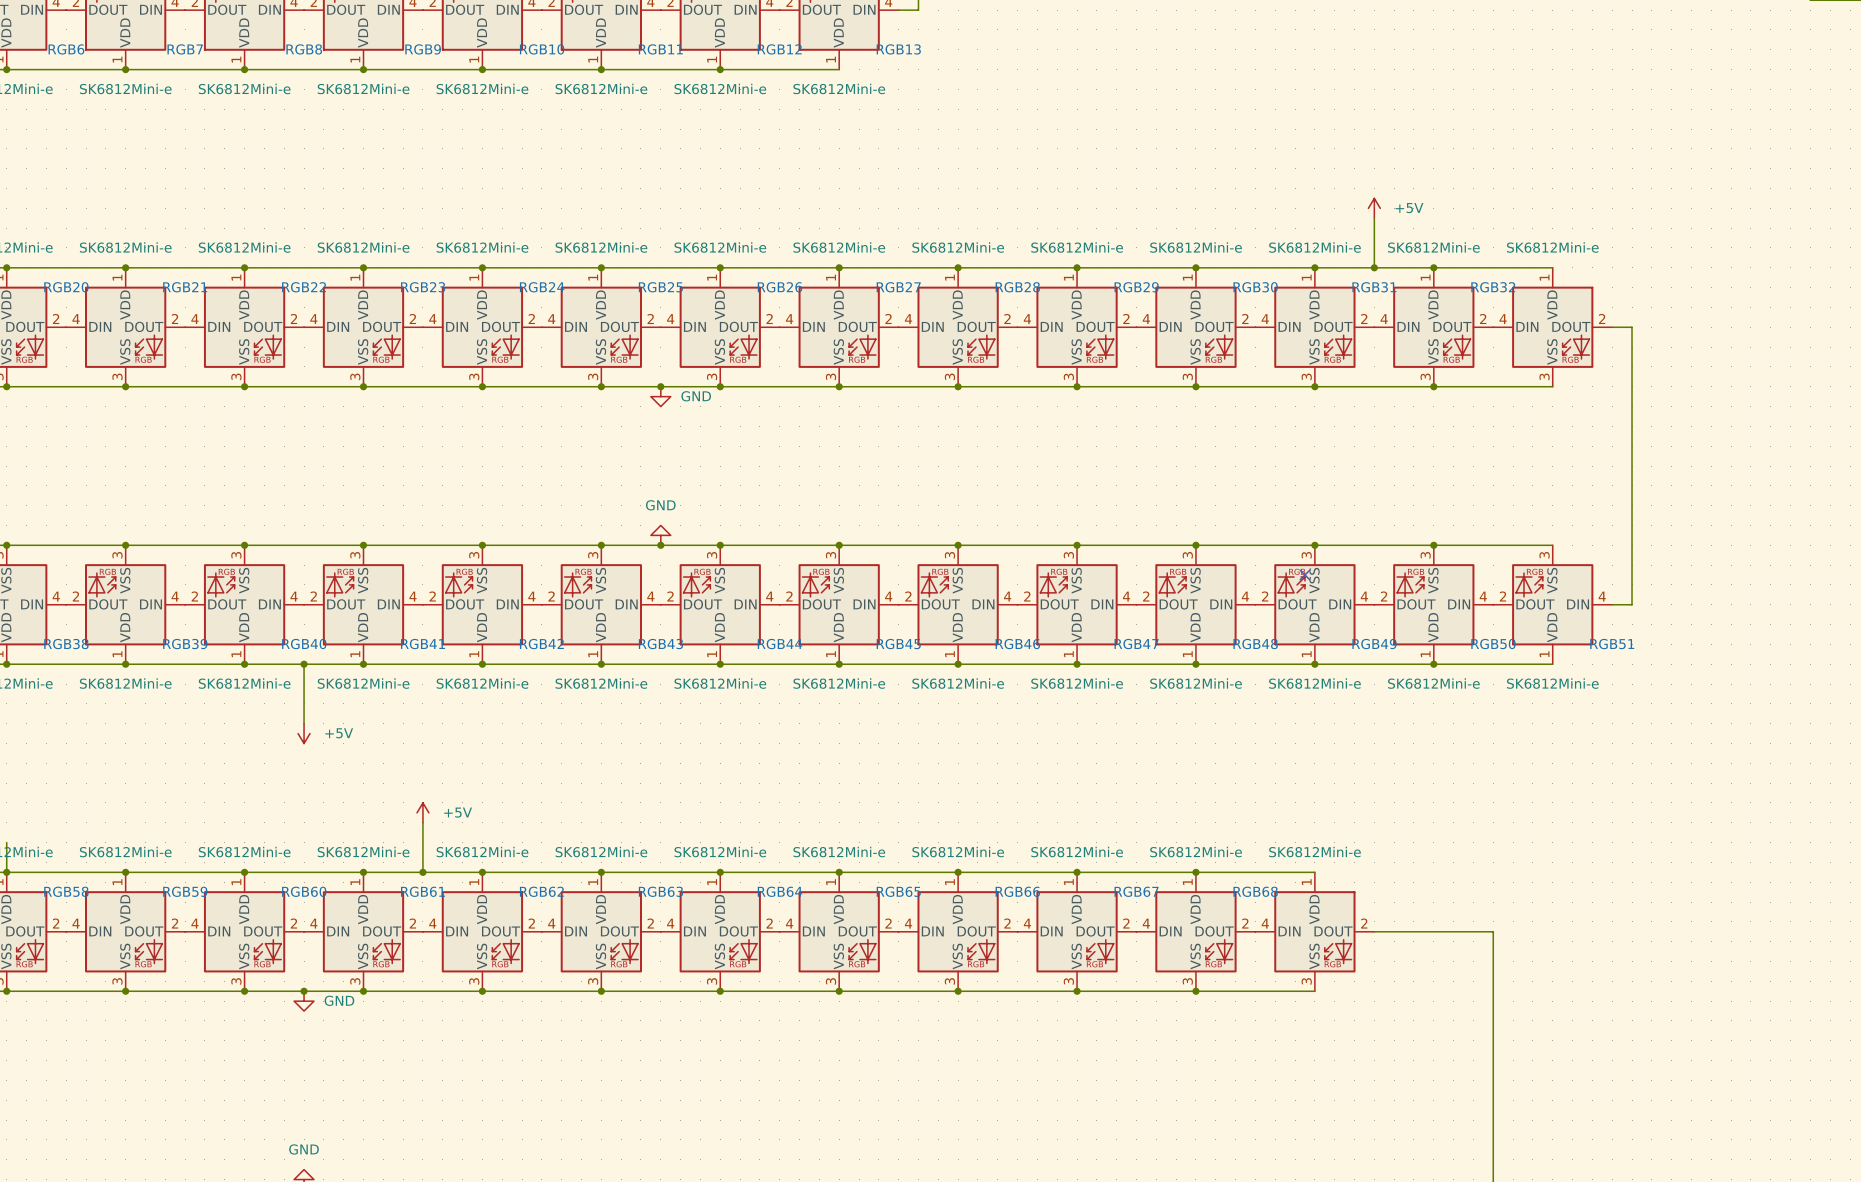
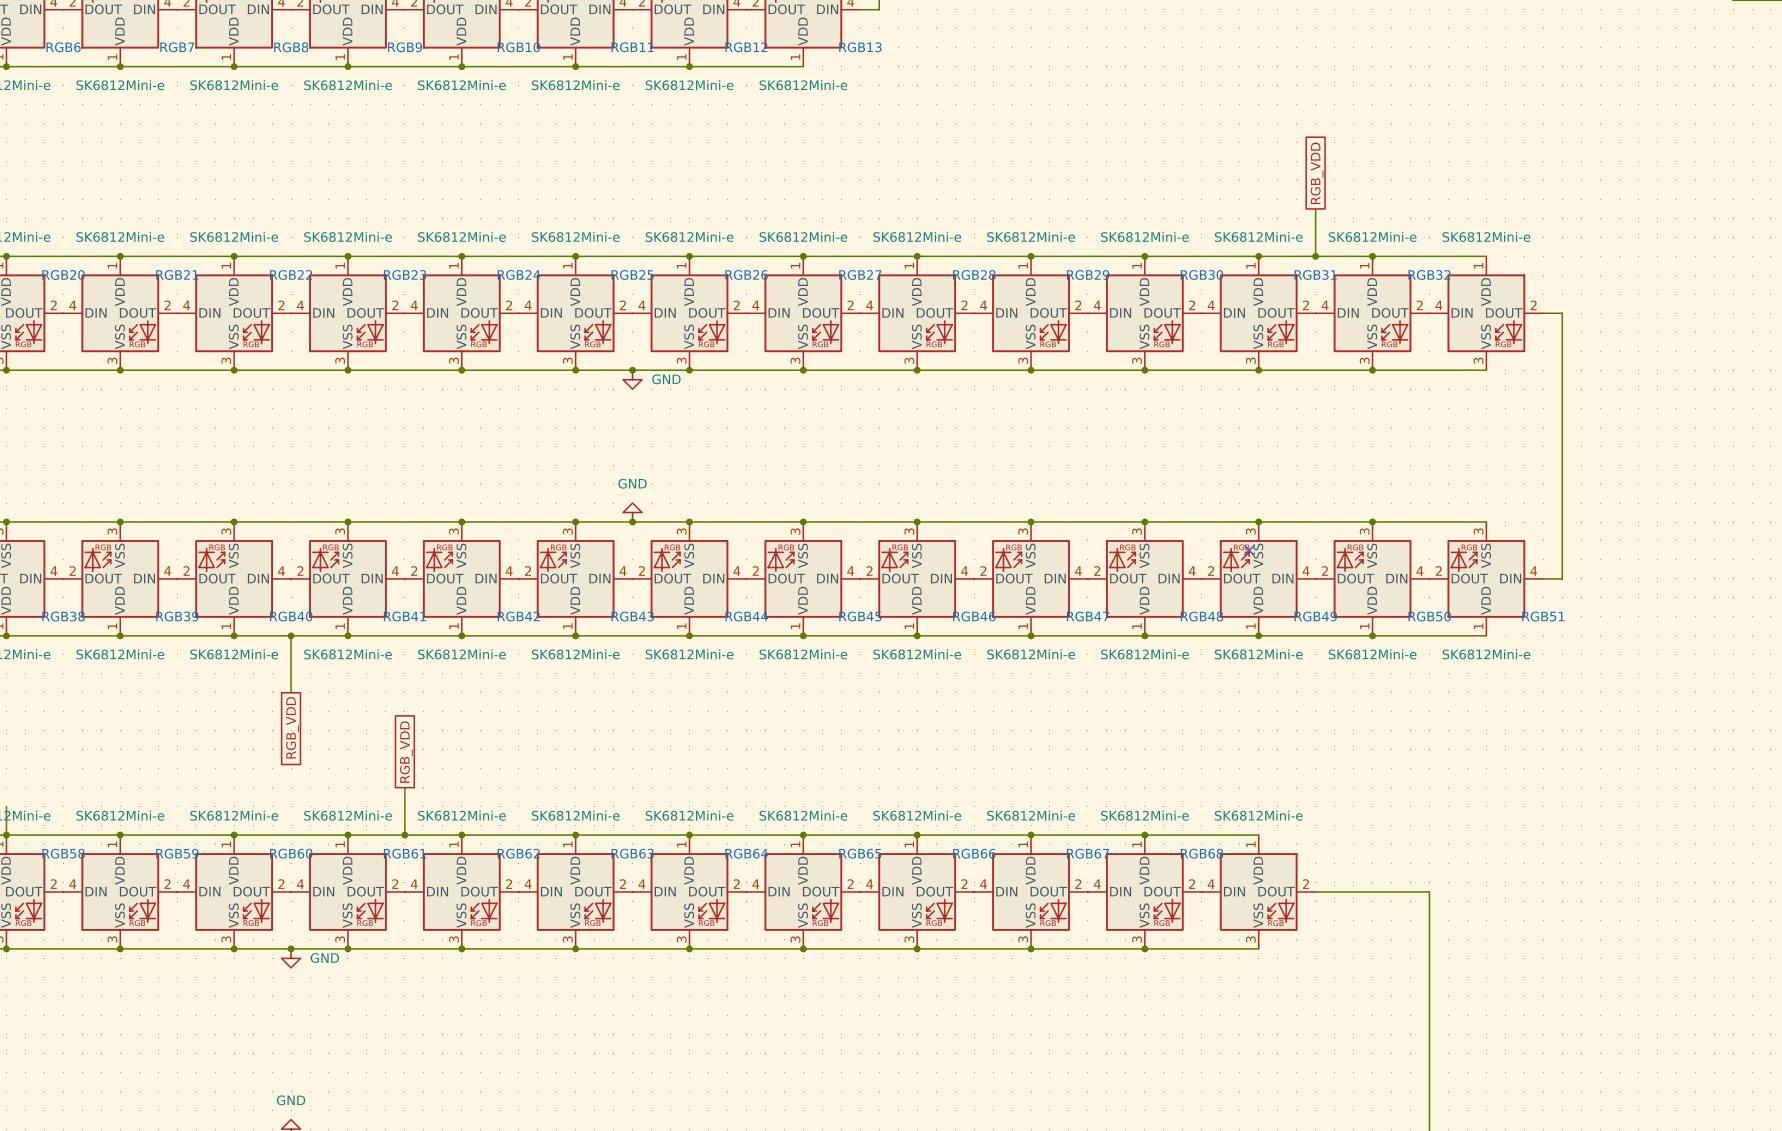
global label: none -> RGB_VDD (1317, 173)
power symbol: +5V (1374, 208) -> none
power symbol: +5V (304, 733) -> none
global label: none -> RGB_VDD (292, 727)
global label: none -> RGB_VDD (406, 752)
power symbol: +5V (422, 812) -> none

